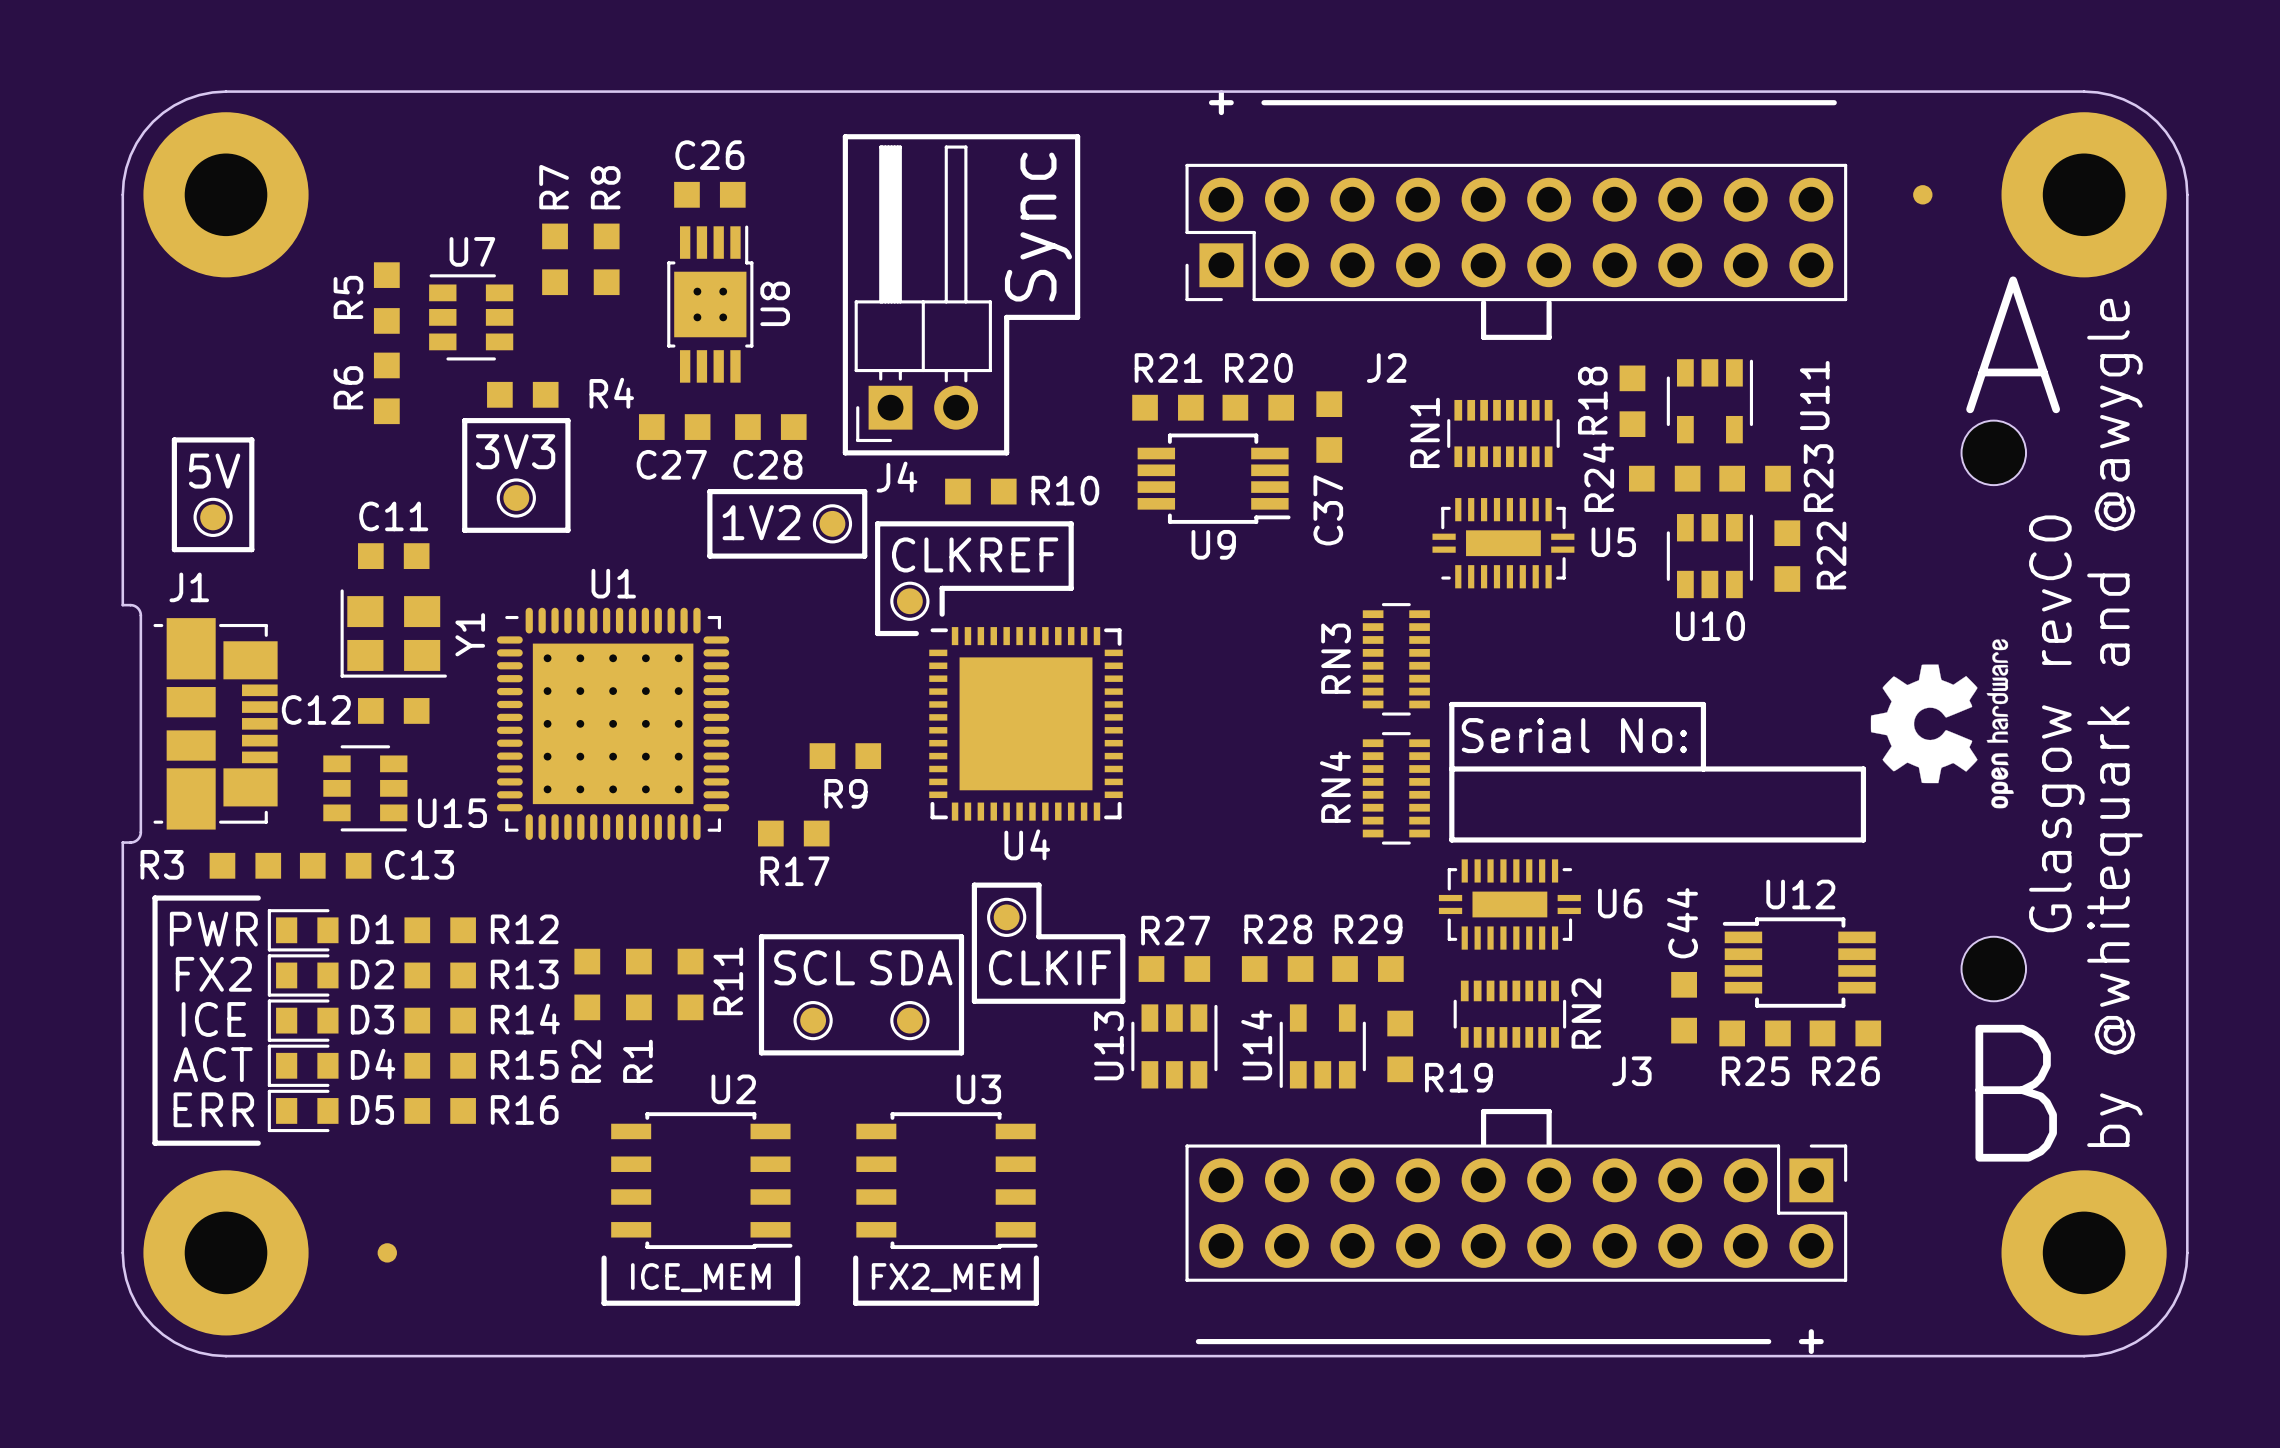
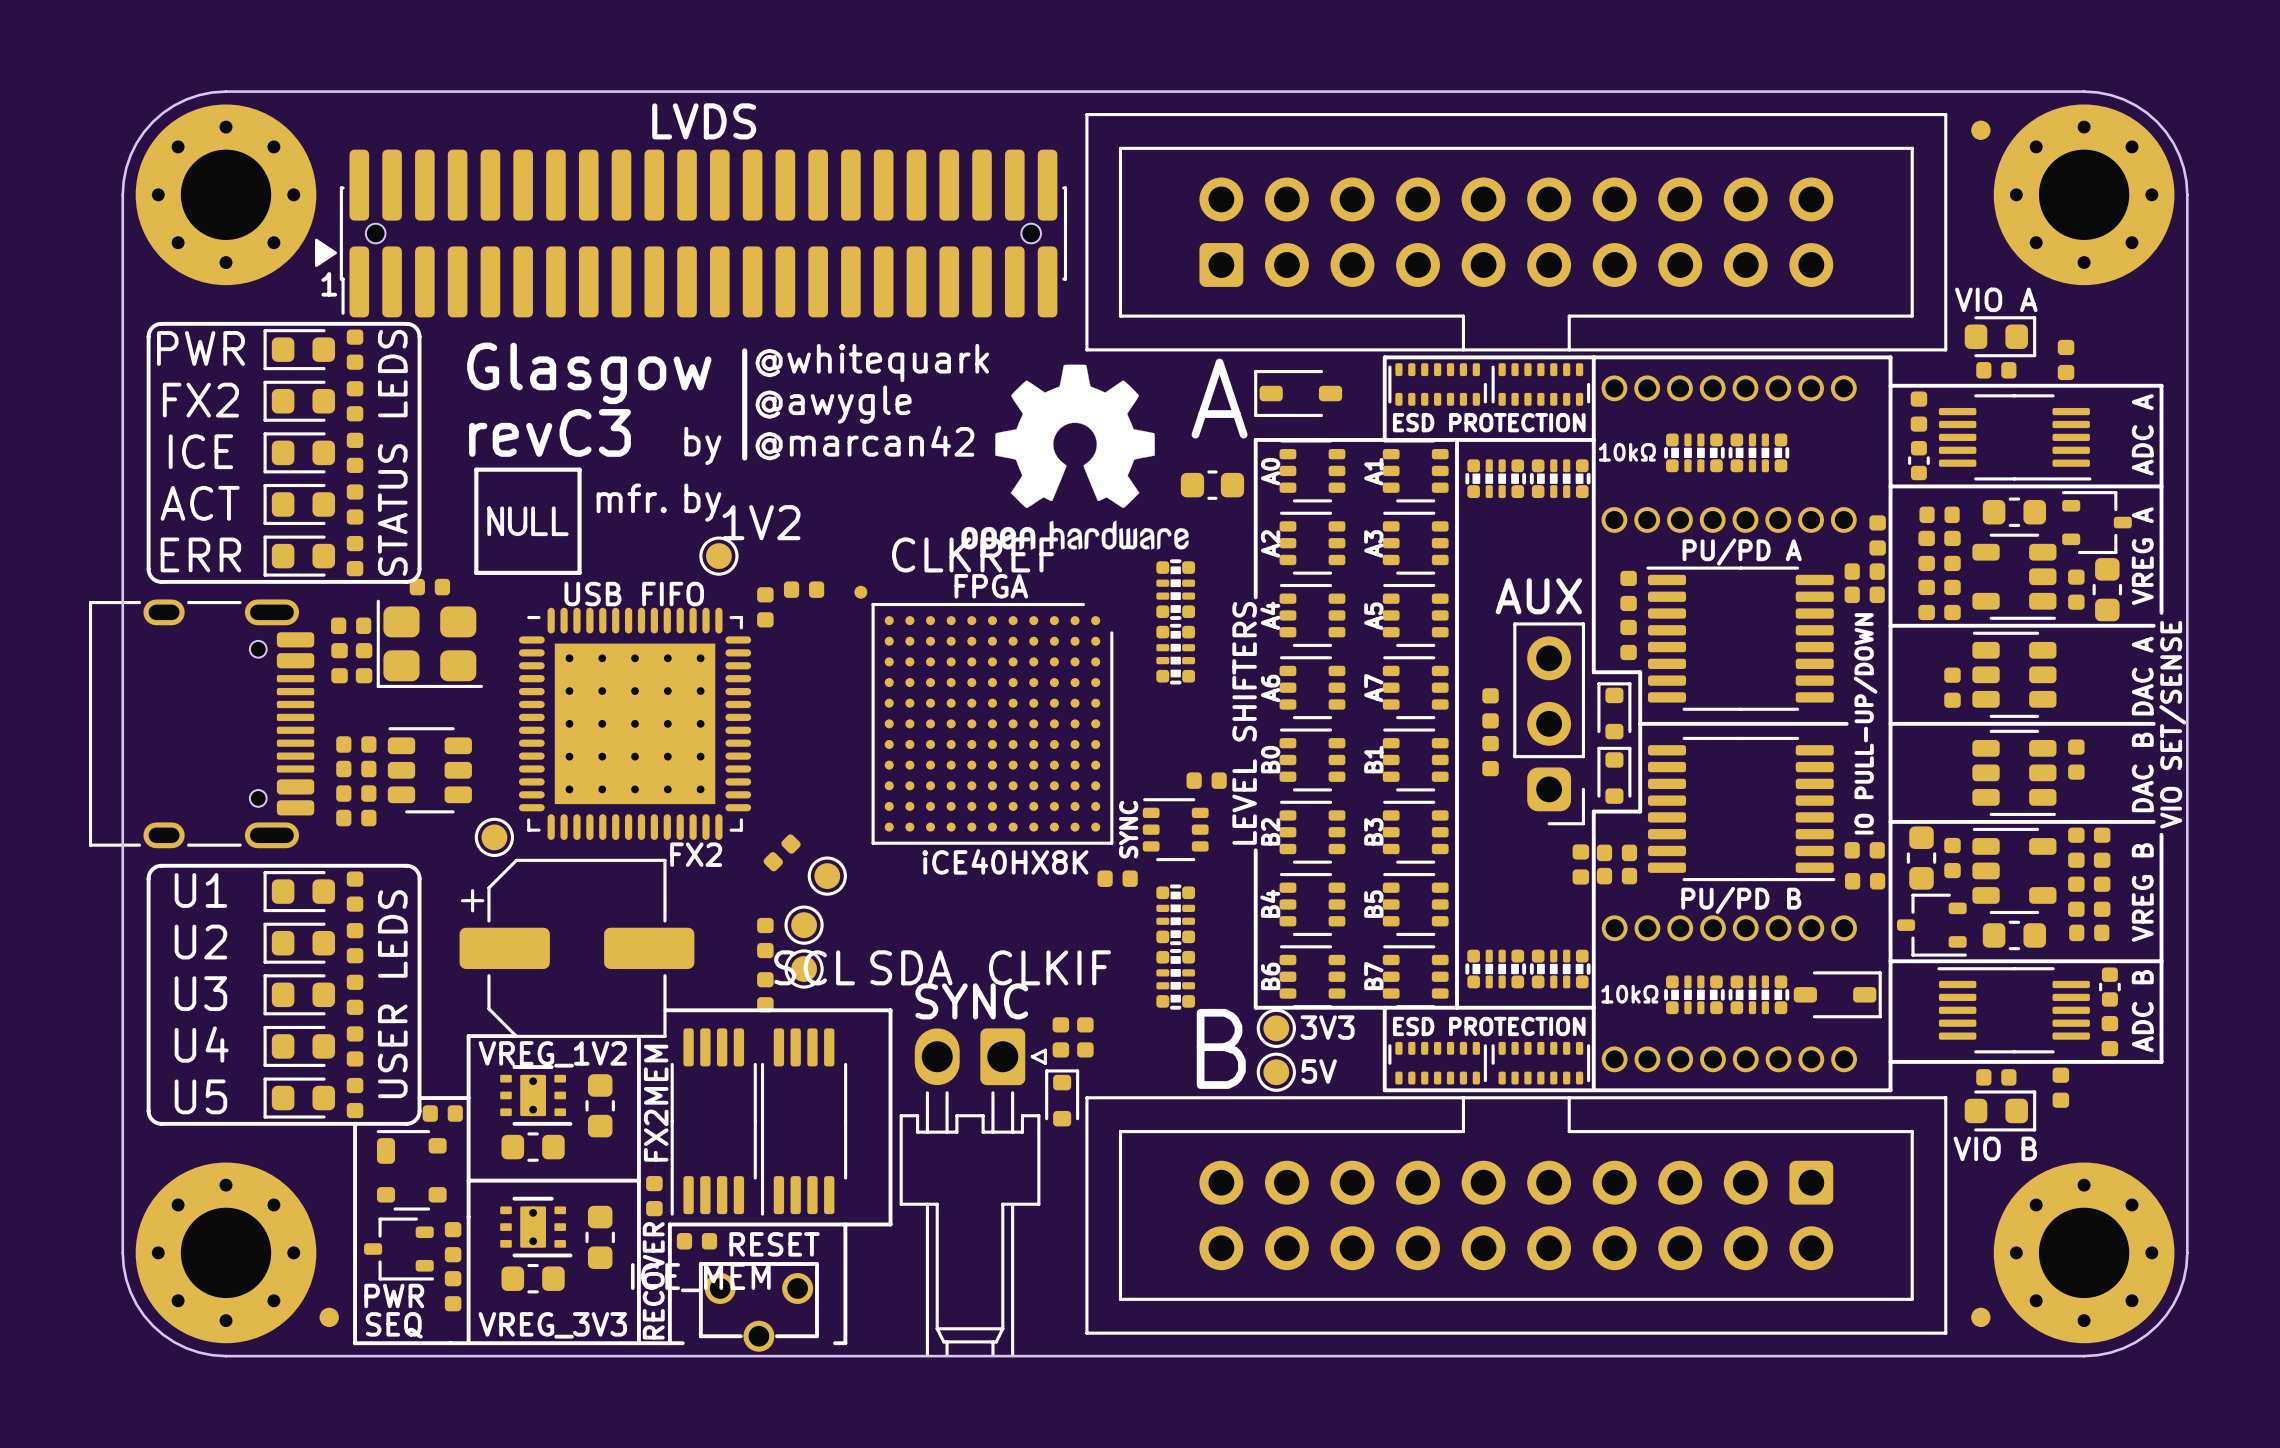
line: (1221, 92) (1221, 112) -> none
line: (1211, 102) (1231, 102) -> none
line: (1263, 102) (1834, 102) -> none
part footprint: [143, 112, 309, 278] -> [135, 104, 317, 286]
part footprint: [2001, 112, 2167, 278] -> [1993, 104, 2175, 286]
text: none -> LVDS (704, 121)
line: (845, 136) (845, 452) (1006, 452) (1006, 317) (1077, 317) (1077, 136) (845, 136) -> none
C26: (709, 194) -> none
part position: (1922, 194) -> (1980, 130)
text: Sync (1038, 227) -> none
J2: (1516, 232) -> none
part: none -> (1516, 232)
part: none -> (703, 233)
drawing: none -> [315, 238, 337, 268]
R7: (555, 259) -> none
R8: (606, 259) -> none
text: none -> 1 (329, 284)
J4: (923, 293) -> none
R5: (386, 298) -> none
text: none -> VIO A (1996, 299)
line: (1483, 302) (1483, 337) (1549, 337) (1549, 302) -> none
U8: (710, 304) -> none
U7: (471, 317) -> none
line: none -> (161, 323) (406, 323) (415, 327) (419, 336) (419, 569) (415, 578) (406, 581) (161, 581) (152, 578) (148, 569) (148, 336) (152, 327) (161, 323)
part: none -> (2000, 336)
text: A (2013, 344) -> none
text: none -> PWR (200, 348)
part: none -> (299, 349)
part: none -> (355, 349)
line: none -> (744, 350) (744, 458)
line: none -> (1593, 357) (1593, 672) (1640, 672) (1640, 811) (1593, 811) (1593, 1087)
part: none -> (2066, 359)
text: none -> @whitequark (872, 363)
drawing: none -> [961, 364, 1189, 558]
part: none -> (1996, 370)
text: none -> Glasgow (589, 373)
part: none -> (1437, 384)
part: none -> (1540, 384)
line: none -> (1890, 385) (2161, 385) (2161, 612)
R6: (386, 388) -> none
part: none -> (1729, 388)
part: none -> (1298, 393)
R4: (522, 394) -> none
text: none -> A (1219, 398)
text: none -> FX2 (200, 400)
part: none -> (299, 401)
part: none -> (355, 401)
R18: (1632, 401) -> none
U11: (1709, 401) -> none
text: none -> @awygle (833, 404)
R21: (1167, 407) -> none
R20: (1258, 407) -> none
part: none -> (1918, 411)
line: (464, 420) (464, 530) (567, 530) (567, 420) (464, 420) -> none
text: none -> ESD PROTECTION (1489, 422)
C27: (674, 427) -> none
C28: (770, 427) -> none
C37: (1329, 427) -> none
text: none -> revC3 (550, 432)
RN1: (1503, 433) -> none
text: none -> ADC A (2142, 434)
part: none -> (2015, 437)
line: (174, 439) (251, 439) (251, 549) (174, 549) (174, 439) -> none
line: none -> (1384, 439) (1384, 357) (1890, 357) (1890, 1090) (1384, 1090) (1384, 1007)
line: none -> (1456, 439) (1456, 1007)
line: none -> (1593, 439) (1255, 439) (1255, 597)
text: none -> @marcan42 (864, 443)
text: none -> by (702, 445)
text: 3V3 (515, 451) -> none
part: none -> (299, 452)
part: none -> (355, 452)
text: none -> STATUS LEDS (392, 452)
text: none -> 10kΩ (1627, 452)
part: none -> (1694, 452)
part: none -> (1758, 452)
part: (1993, 452) -> none
part: none -> (1918, 460)
drawing: none -> [474, 467, 582, 575]
part: none -> (1312, 470)
part: none -> (1415, 470)
text: 5V (214, 471) -> none
text: none -> A0 (1270, 471)
text: none -> A1 (1373, 471)
U9: (1214, 478) -> none
part: none -> (1495, 478)
part: none -> (1560, 478)
R24: (1664, 478) -> none
R23: (1755, 478) -> none
part: none -> (1212, 485)
line: none -> (1890, 486) (2161, 486)
line: (709, 491) (864, 491) (864, 556) (709, 556) (709, 491) -> none
R10: (980, 491) -> none
part: (516, 498) -> none
text: none -> mfr. (631, 498)
text: none -> by (702, 502)
part: none -> (299, 504)
part: none -> (355, 504)
part: none -> (2014, 512)
part: none -> (1939, 514)
part: (213, 517) -> none
part: none -> (1729, 519)
part: none -> (2096, 522)
part: (832, 523) -> none
part: none -> (1877, 535)
text: none -> A2 (1270, 543)
part: none -> (1312, 543)
text: none -> A3 (1373, 543)
part: none -> (1415, 543)
U5: (1503, 543) -> none
part: none -> (1926, 550)
part: none -> (1952, 550)
text: none -> PU/PD A (1742, 551)
part: none -> (299, 556)
part: none -> (355, 556)
C11: (393, 556) -> none
part: none -> (718, 556)
U10: (1709, 556) -> none
R22: (1787, 556) -> none
text: none -> VREG A (2142, 556)
part: none -> (1864, 571)
part: none -> (2014, 576)
U1 name: U1 (613, 583) -> none
text: none -> FPGA (991, 586)
part: none -> (429, 587)
part: none -> (804, 589)
part: none -> (1175, 589)
part: none -> (2076, 589)
part: none -> (2107, 589)
part: none -> (1628, 590)
part: none -> (860, 592)
text: none -> USB FIFO (634, 594)
part: none -> (1864, 594)
text: none -> AUX (1538, 596)
part: none -> (1926, 599)
part: none -> (1952, 599)
part: (909, 601) -> none
board edge: (122, 605) (135, 606) (140, 615) (140, 833) (135, 841) (122, 842) -> (122, 605) (122, 842)
part: none -> (765, 607)
line: (942, 614) (942, 588) (1071, 588) (1071, 523) (877, 523) (877, 633) (916, 633) -> none
text: none -> A4 (1270, 615)
part: none -> (1312, 615)
part: none -> (1415, 615)
text: none -> A5 (1373, 616)
part: none -> (351, 625)
line: none -> (1890, 625) (2153, 625)
Y1: (393, 633) -> none
part: none -> (1740, 638)
part: none -> (1628, 639)
drawing: [1870, 639, 2014, 809] -> none
part: none -> (429, 643)
part: none -> (1175, 654)
RN3: (1396, 659) -> none
part: none -> (339, 663)
part: none -> (364, 663)
part: none -> (2014, 674)
text: none -> DAC A (2142, 676)
part: none -> (1312, 687)
part: none -> (1415, 687)
part: none -> (1952, 687)
text: none -> A6 (1270, 688)
text: none -> A7 (1373, 688)
part: none -> (1490, 708)
C12: (393, 710) -> none
part: none -> (1614, 710)
text: by @whitequark and @awygle (2114, 722) -> none
part: none -> (201, 723)
J1: (215, 723) -> none
U1 position: (613, 723) -> (635, 723)
part: none -> (992, 723)
U4: (1026, 723) -> none
text: none -> LEVEL SHIFTERS (1244, 723)
part: none -> (1549, 723)
line: none -> (1640, 723) (1846, 723)
text: none -> IO PULL-UP/DOWN (1865, 723)
line: none -> (1890, 723) (2153, 723)
text: Glasgow revC0 (2056, 723) -> none
text: none -> VIO SET/SENSE (2172, 724)
text: Serial No: (1574, 735) -> none
part: none -> (356, 744)
R9: (845, 756) -> none
part: none -> (1490, 756)
text: none -> B0 (1270, 759)
part: none -> (1312, 759)
text: none -> B1 (1373, 759)
part: none -> (1415, 759)
part: none -> (2076, 759)
part: none -> (356, 769)
line: (1451, 769) (1863, 769) (1863, 839) (1451, 839) (1451, 704) (1703, 704) (1703, 769) -> none
part: none -> (429, 770)
part: none -> (2014, 772)
text: none -> DAC B (2142, 772)
part: none -> (1614, 775)
part: none -> (1206, 780)
U15: (365, 788) -> none
RN4: (1396, 788) -> none
part: none -> (356, 793)
part: none -> (1741, 809)
part: none -> (356, 818)
line: none -> (1890, 821) (2153, 821)
text: none -> SYNC (1128, 829)
part: none -> (1175, 829)
text: none -> B2 (1270, 831)
text: none -> B3 (1373, 831)
part: none -> (1312, 832)
part: none -> (1415, 832)
R17: (793, 833) -> none
line: none -> (2161, 834) (2161, 1061) (1890, 1061)
part: none -> (494, 837)
part: none -> (2076, 847)
part: none -> (2102, 847)
line: none -> (1255, 850) (1255, 1007) (1593, 1007)
part: none -> (1864, 850)
part: none -> (782, 852)
part: none -> (1616, 852)
text: none -> FX2 (696, 854)
part: none -> (1921, 858)
part: none -> (1952, 858)
text: none -> iCE40HX8K (1005, 861)
part: none -> (1580, 864)
line: none -> (161, 865) (406, 865) (415, 869) (419, 878) (419, 1110) (415, 1120) (406, 1123) (161, 1123) (152, 1120) (148, 1110) (148, 878) (152, 869) (161, 865)
R3: (245, 865) -> none
C13: (335, 865) -> none
part: none -> (2014, 870)
part: none -> (827, 876)
part: none -> (1616, 876)
part: none -> (1117, 878)
part: none -> (1865, 881)
line: (974, 885) (1038, 885) (1038, 936) (1122, 936) (1122, 1001) (974, 1001) (974, 885) -> none
text: none -> U1 (200, 890)
part: none -> (299, 891)
part: none -> (355, 891)
text: none -> VREG B (2142, 892)
part: none -> (2076, 896)
part: none -> (2102, 896)
line: (258, 898) (155, 898) (155, 1143) (258, 1143) -> none
text: none -> PU/PD B (1741, 900)
text: none -> B4 (1270, 903)
part: none -> (1312, 904)
text: none -> B5 (1373, 904)
part: none -> (1415, 904)
U6: (1509, 904) -> none
part: none -> (1175, 914)
part: (1006, 917) -> none
part: none -> (804, 925)
part: none -> (1931, 925)
part: none -> (1729, 928)
text: PWR (213, 929) -> none
D1: (303, 930) -> none
R12: (440, 930) -> none
part: none -> (2089, 932)
part: none -> (2014, 935)
line: (761, 936) (961, 936) (961, 1052) (761, 1052) (761, 936) -> none
part: none -> (765, 938)
text: none -> U2 (200, 942)
part: none -> (299, 943)
part: none -> (355, 943)
part: none -> (576, 948)
line: none -> (1890, 961) (2161, 961)
U12: (1799, 962) -> none
part: none -> (804, 969)
R27: (1174, 969) -> none
R28: (1277, 969) -> none
R29: (1367, 969) -> none
part: none -> (1495, 969)
part: none -> (1560, 969)
part: (1993, 969) -> none
text: FX2 (213, 974) -> none
D2: (303, 975) -> none
R13: (440, 975) -> none
text: none -> B6 (1270, 976)
part: none -> (1312, 976)
text: none -> B7 (1373, 976)
part: none -> (1415, 976)
part: none -> (1175, 979)
R2: (587, 984) -> none
R1: (638, 984) -> none
R11: (690, 984) -> none
part: none -> (2109, 987)
part: none -> (765, 992)
text: none -> U3 (200, 993)
part: none -> (299, 994)
part: none -> (355, 994)
text: none -> USER LEDS (392, 994)
text: none -> 10kΩ (1629, 994)
part: none -> (1694, 994)
part: none -> (1758, 994)
part: none -> (1837, 994)
text: none -> SYNC (971, 1001)
C44: (1684, 1007) -> none
line: none -> (665, 1010) (890, 1010) (890, 1224) (669, 1224) (669, 1343)
part: none -> (2013, 1010)
text: none -> ADC B (2142, 1011)
RN2: (1509, 1014) -> none
text position: ICE (213, 1019) -> ICE (200, 451)
D3: (303, 1020) -> none
R14: (440, 1020) -> none
part: (813, 1020) -> none
part: (909, 1020) -> none
text: none -> ESD PROTECTION (1489, 1026)
text: none -> 3V3 (1327, 1027)
part: none -> (1276, 1028)
R25: (1755, 1033) -> none
R26: (1845, 1033) -> none
line: none -> (515, 1036) (468, 1036) (468, 1343)
line: none -> (638, 1036) (638, 1343)
part: none -> (2109, 1036)
part: none -> (1060, 1037)
part: none -> (1085, 1037)
text: none -> U4 (201, 1044)
part: none -> (299, 1046)
part: none -> (355, 1046)
U13: (1174, 1046) -> none
U14: (1322, 1046) -> none
R19: (1400, 1046) -> none
text: none -> B (1221, 1048)
text: none -> VREG_1V2 (552, 1054)
part: none -> (1729, 1059)
part: none -> (1437, 1063)
part: none -> (1540, 1063)
text position: ACT (213, 1064) -> ACT (200, 503)
D4: (303, 1065) -> none
R15: (440, 1065) -> none
text: none -> 5V (1319, 1071)
part: none -> (1276, 1072)
part: none -> (1996, 1077)
part: none -> (2060, 1087)
text: B (2016, 1093) -> none
part: none -> (536, 1095)
text: none -> U5 (200, 1096)
part: none -> (1062, 1097)
part: none -> (299, 1098)
part: none -> (355, 1098)
line: none -> (419, 1098) (468, 1098)
text: none -> FX2MEM (656, 1103)
part: none -> (600, 1105)
text position: ERR (213, 1109) -> ERR (200, 554)
D5: (303, 1110) -> none
R16: (440, 1110) -> none
part: none -> (2000, 1110)
part: none -> (442, 1113)
part: none -> (713, 1122)
part: none -> (804, 1122)
line: none -> (355, 1123) (355, 1343) (682, 1343)
line: (1483, 1144) (1483, 1111) (1549, 1111) (1549, 1144) -> none
part: none -> (533, 1147)
text: none -> VIO B (1995, 1148)
part footprint: [143, 1170, 309, 1336] -> [135, 1162, 317, 1344]
part: none -> (411, 1170)
part footprint: [2001, 1170, 2167, 1336] -> [1993, 1162, 2175, 1344]
line: none -> (468, 1180) (638, 1180)
U2: (701, 1180) -> none
U3: (946, 1180) -> none
part: none -> (973, 1192)
part: none -> (654, 1196)
J3: (1516, 1213) -> none
part: none -> (1516, 1215)
line: none -> (845, 1224) (845, 1343) (835, 1343)
part: none -> (536, 1227)
part: none -> (600, 1237)
part: none -> (696, 1241)
part: none -> (453, 1242)
part footprint: [377, 1243, 397, 1263] -> [364, 1217, 435, 1281]
text: none -> RESET (774, 1244)
line: (604, 1258) (604, 1303) (797, 1303) (797, 1258) -> none
line: (855, 1258) (855, 1303) (1036, 1303) (1036, 1258) -> none
text: FX2_MEM (946, 1277) -> none
part: none -> (533, 1278)
text: none -> RECOVER (653, 1280)
part: none -> (453, 1291)
text: none -> PWR (394, 1295)
part: none -> (758, 1306)
part: none -> (329, 1317)
part: none -> (1980, 1317)
text: none -> SEQ (394, 1325)
text: none -> VREG_3V3 (552, 1325)
line: (1811, 1331) (1811, 1351) -> none
line: (1198, 1341) (1768, 1341) -> none
line: (1801, 1341) (1821, 1341) -> none

